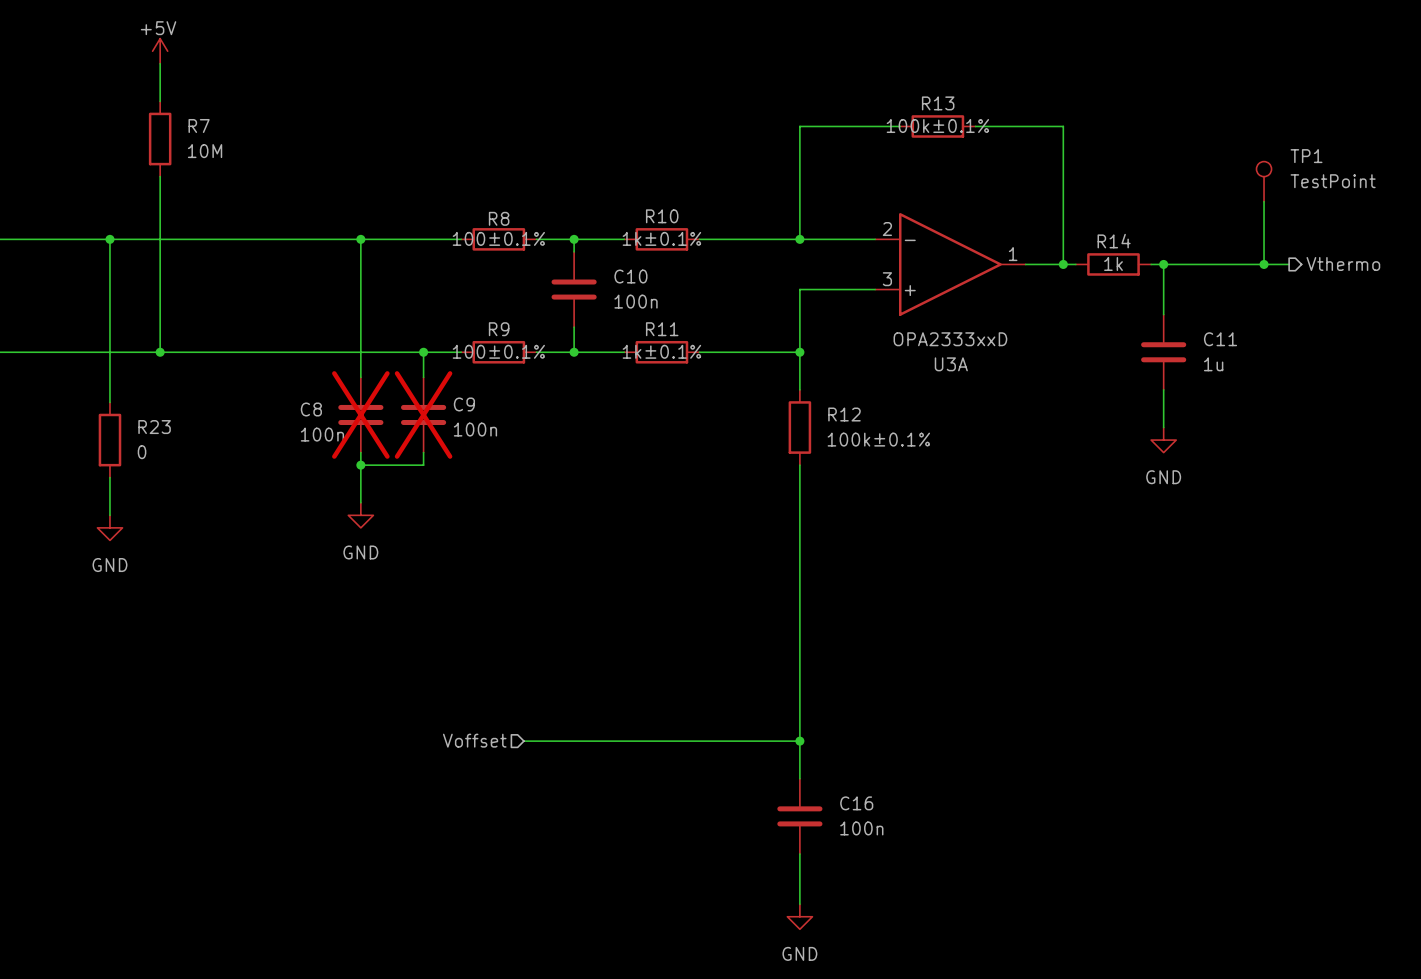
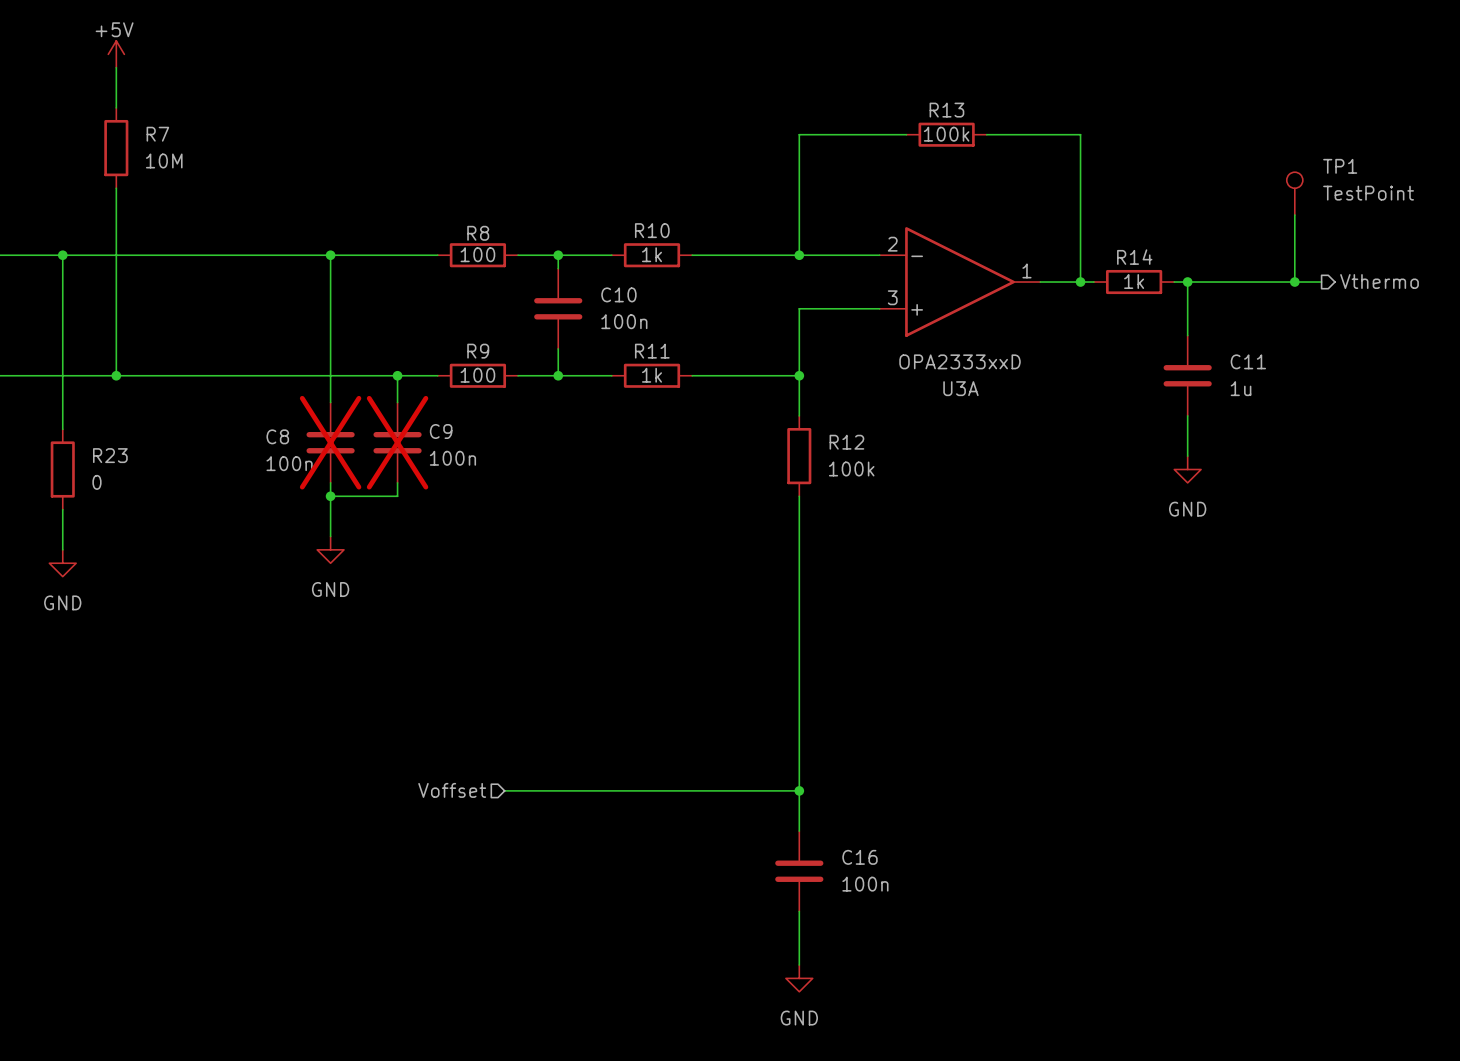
R13 value: 100k±0.1% (937, 126) -> 100k (946, 134)
R8 value: 100±0.1% (498, 238) -> 100 (477, 254)
R10 value: 1k±0.1% (661, 238) -> 1k (652, 254)
R9 value: 100±0.1% (498, 351) -> 100 (477, 375)
R11 value: 1k±0.1% (661, 351) -> 1k (652, 375)
R12 value: 100k±0.1% (878, 439) -> 100k (851, 468)

